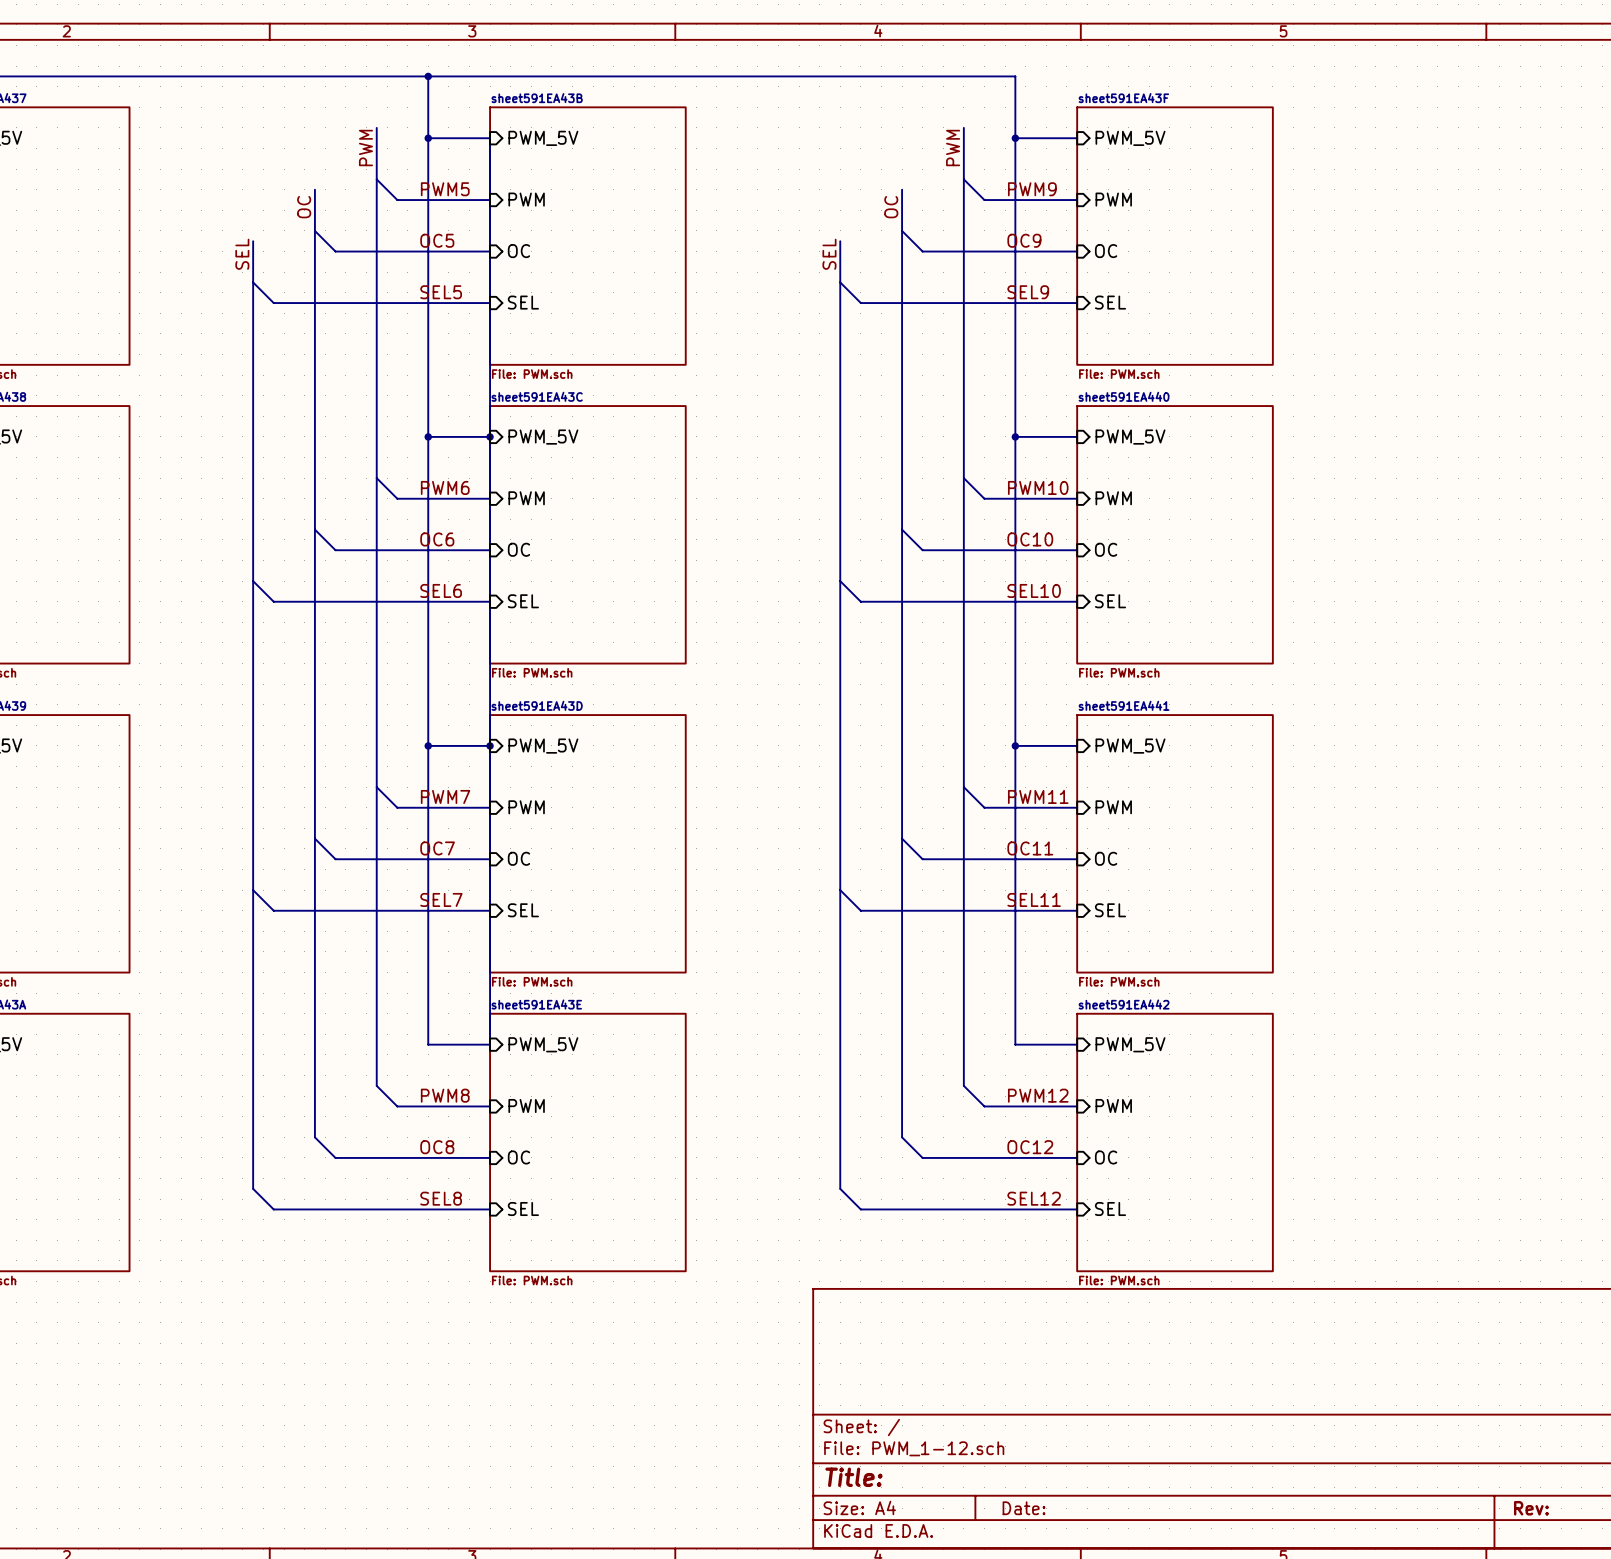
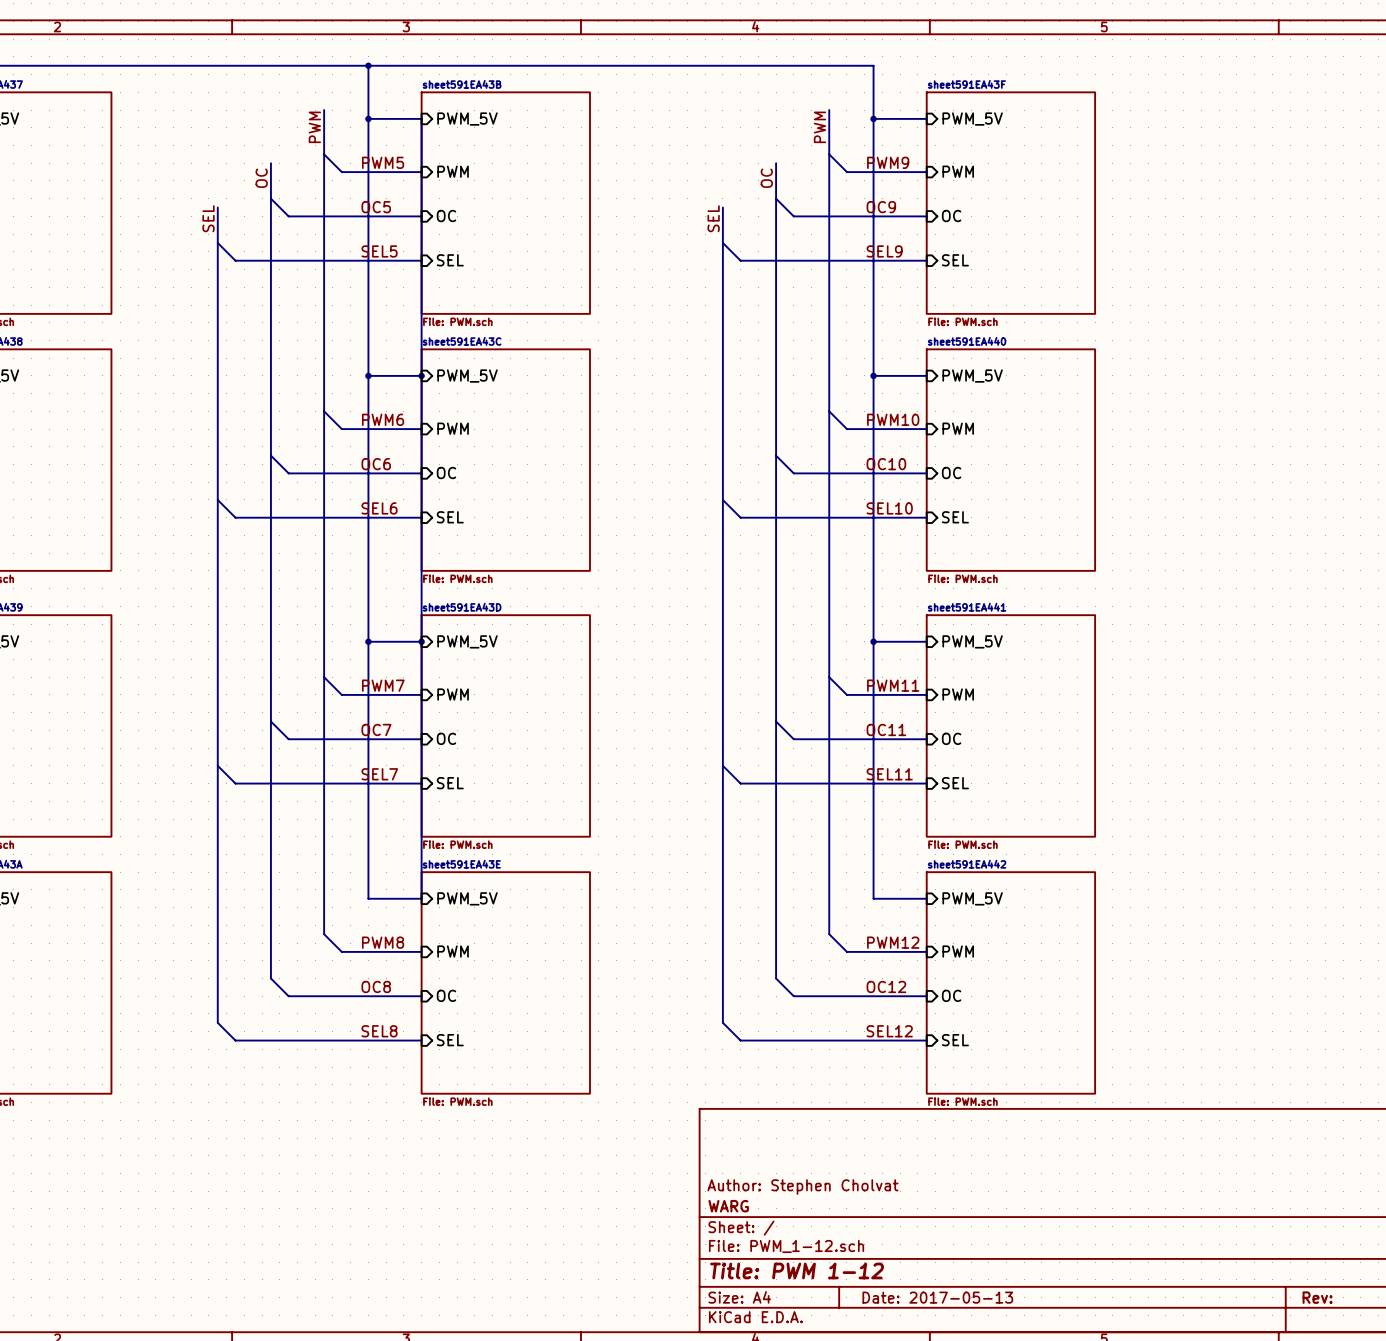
title block: none -> Author: Stephen Cholvat (802, 1187)
title block: none -> WARG (728, 1206)
title block: Title: (853, 1477) -> Title: PWM 1-12 (797, 1270)
title block: Date: (1024, 1508) -> Date: 2017-05-13 (937, 1297)

